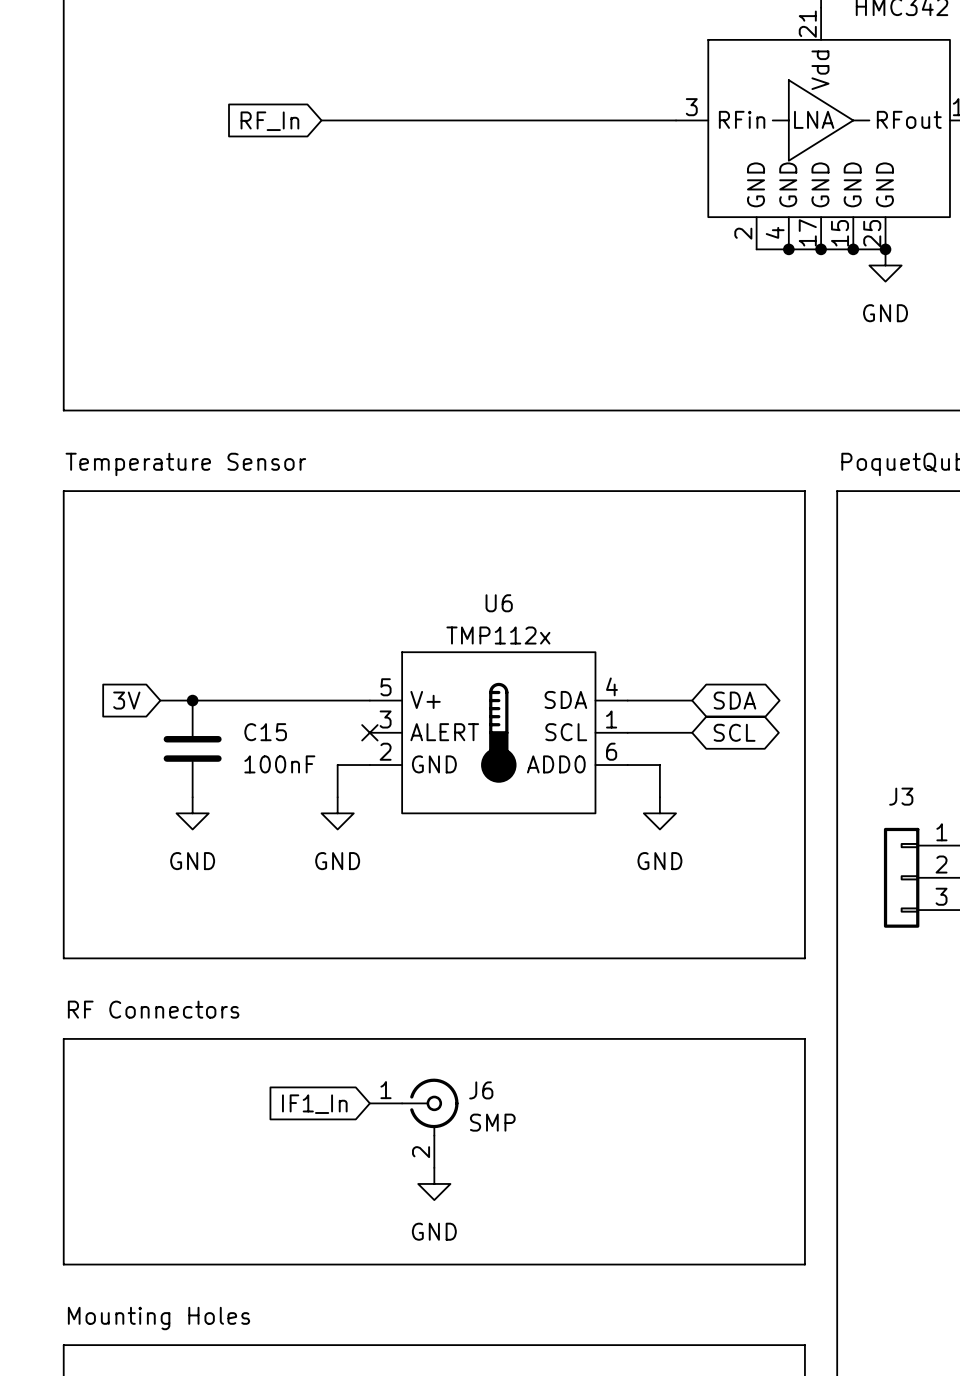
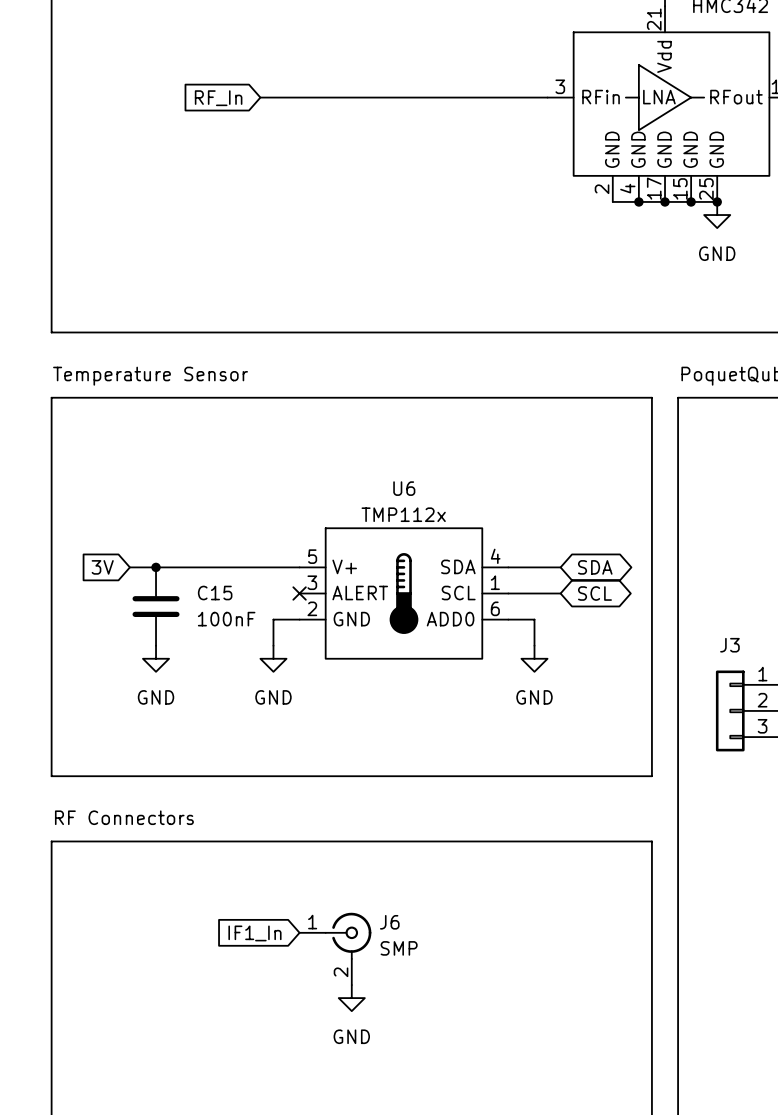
global label position: IF1_In (314, 1104) -> IF1_In (254, 933)
J6 position: (414, 1123) -> (335, 948)
power symbol position: GND (434, 1183) -> GND (351, 998)
line: (63, 1264) (804, 1264) -> (51, 1024) (51, 1089)
text: Mounting Holes (158, 1318) -> none
line: (63, 1345) (804, 1345) -> (651, 1024) (651, 1089)

